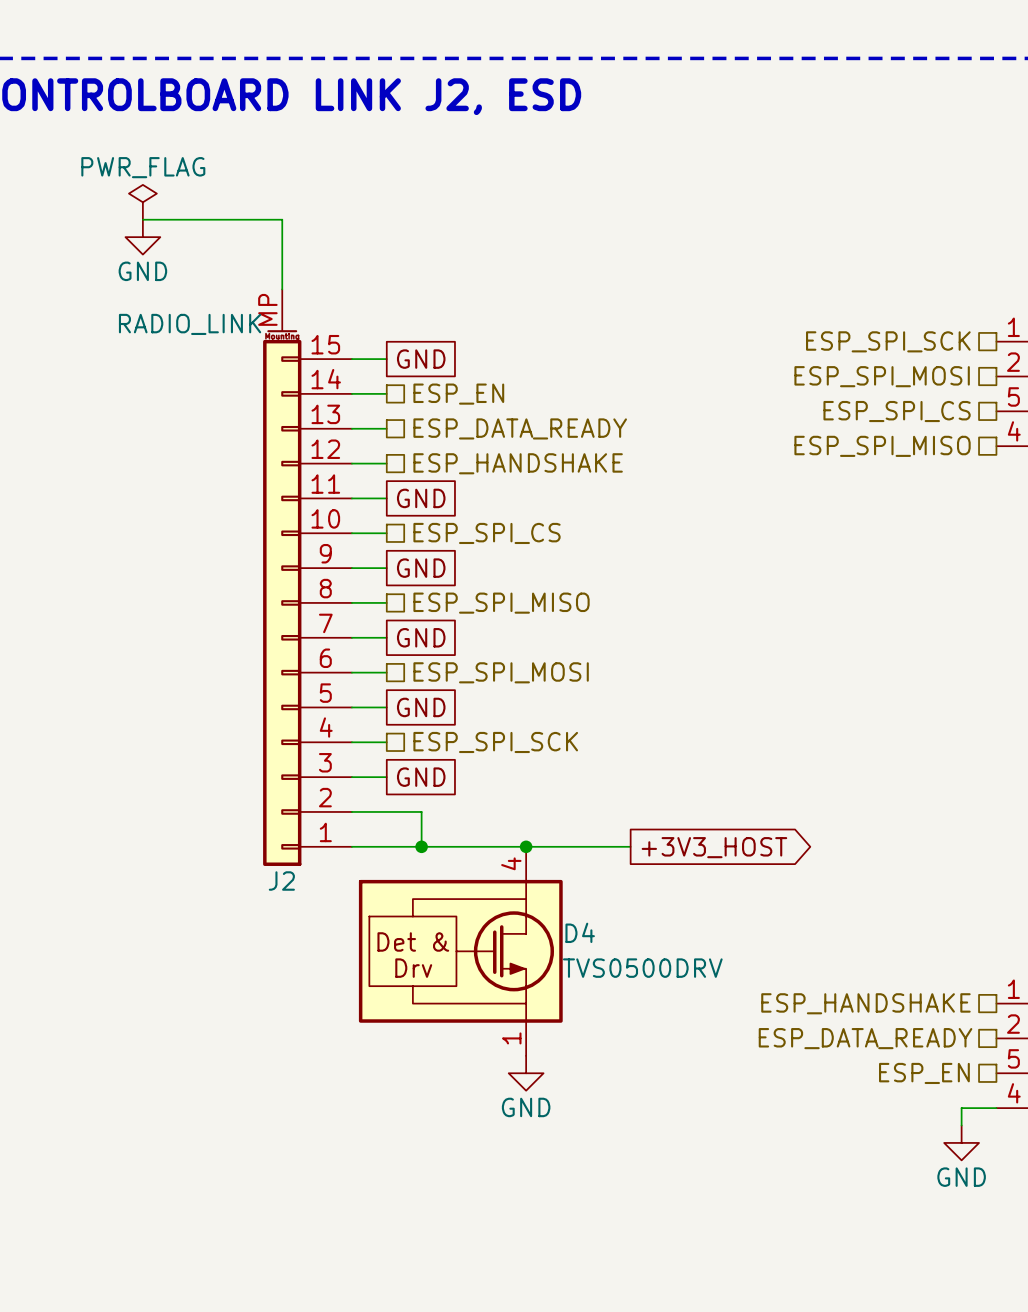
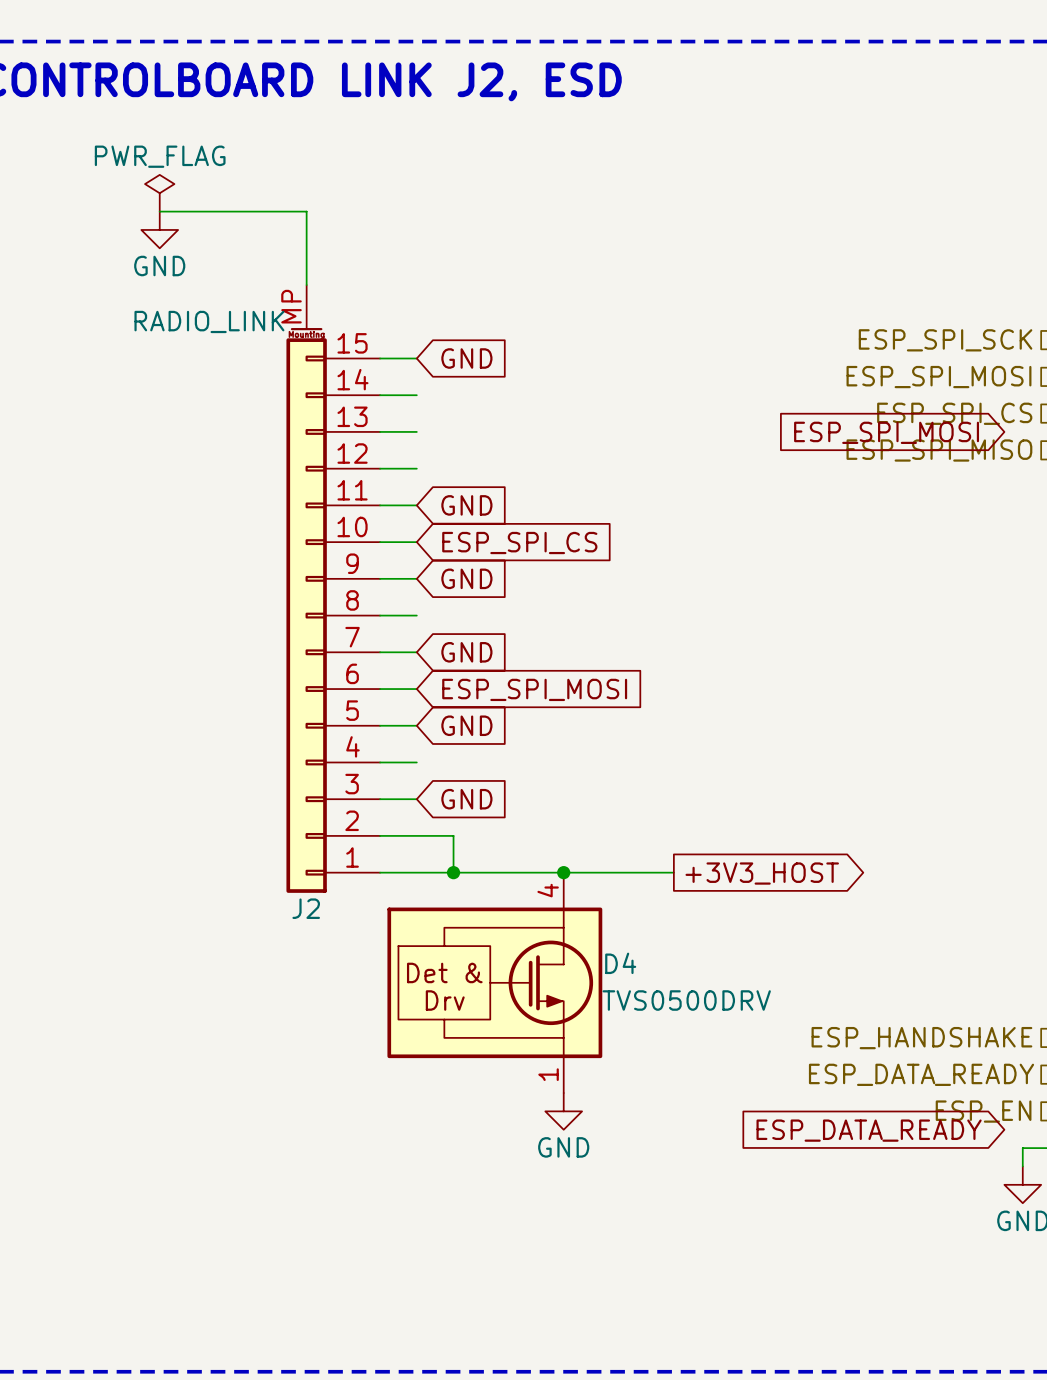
global label shape: passive (421, 359) -> input (466, 358)
hierarchical label: ESP_EN (458, 394) -> none
hierarchical label: ESP_DATA_READY (520, 428) -> none
global label: none -> ESP_SPI_MOSI (886, 432)
hierarchical label: ESP_HANDSHAKE (518, 463) -> none
global label shape: passive (421, 498) -> input (466, 505)
hierarchical label: ESP_SPI_CS (487, 533) -> none
global label: none -> ESP_SPI_CS (519, 543)
global label shape: passive (421, 568) -> input (466, 578)
hierarchical label: ESP_SPI_MISO (501, 603) -> none
global label shape: passive (421, 637) -> input (466, 652)
hierarchical label: ESP_SPI_MOSI (501, 672) -> none
global label: none -> ESP_SPI_MOSI (534, 689)
global label shape: passive (421, 707) -> input (466, 725)
hierarchical label: ESP_SPI_SCK (495, 742) -> none
global label shape: passive (421, 777) -> input (466, 799)
global label: none -> ESP_DATA_READY (869, 1130)

